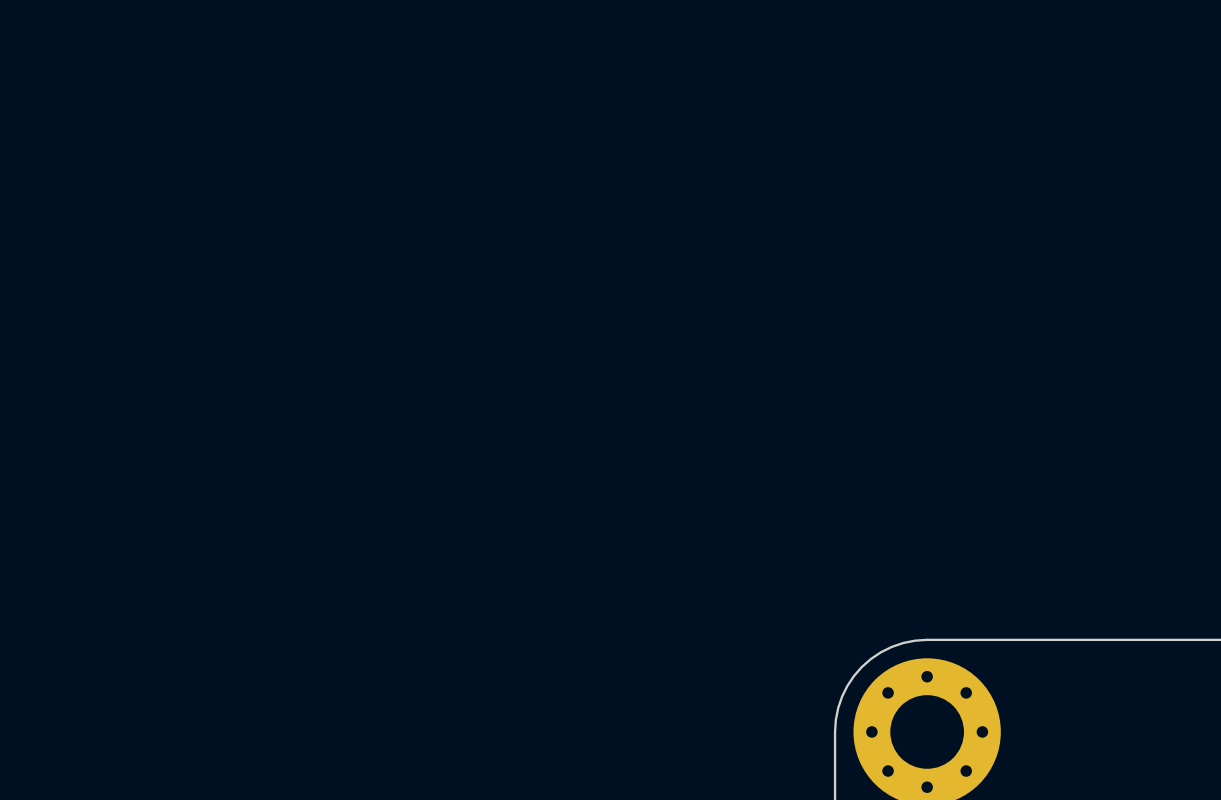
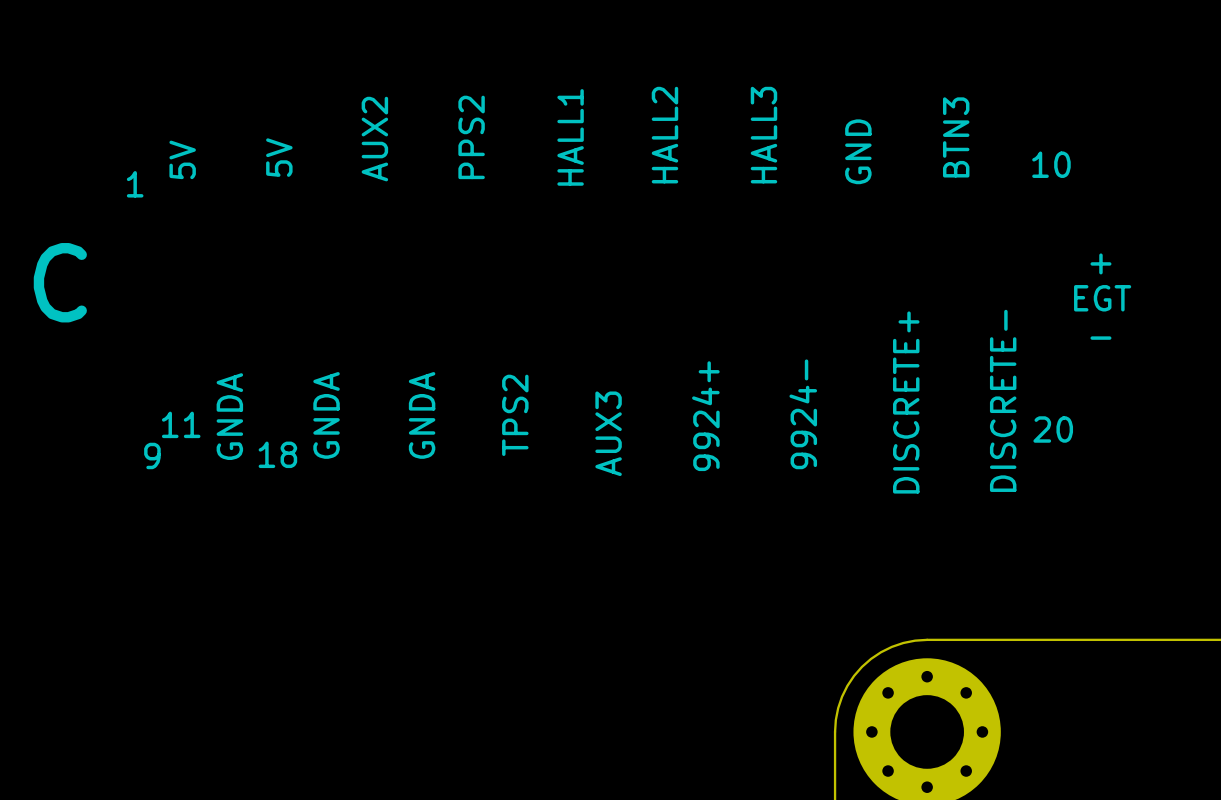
text: none -> HALL2 (664, 135)
text: none -> HALL3 (763, 135)
text: none -> PPS2 (471, 137)
text: none -> HALL1 (570, 137)
text: none -> BTN3 (956, 137)
text: none -> AUX2 (374, 139)
text: none -> GND (858, 151)
text: none -> 5V (279, 157)
text: none -> 5V (182, 159)
text: none -> 10 (1051, 164)
text: none -> 1 (135, 184)
text: none -> + (1100, 263)
text: none -> C (60, 282)
text: none -> EGT (1102, 298)
text: none -> - (1100, 338)
text: none -> DISCRETE- (1003, 400)
text: none -> DISCRETE+ (906, 402)
text: none -> 9924- (803, 414)
text: none -> GNDA (326, 415)
text: none -> GNDA (422, 415)
text: none -> TPS2 (515, 415)
text: none -> GNDA (229, 416)
text: none -> 9924+ (705, 416)
text: none -> 11 (181, 424)
text: none -> 20 (1053, 429)
text: none -> AUX3 (608, 433)
text: none -> 18 (277, 454)
text: none -> 9 (152, 455)

